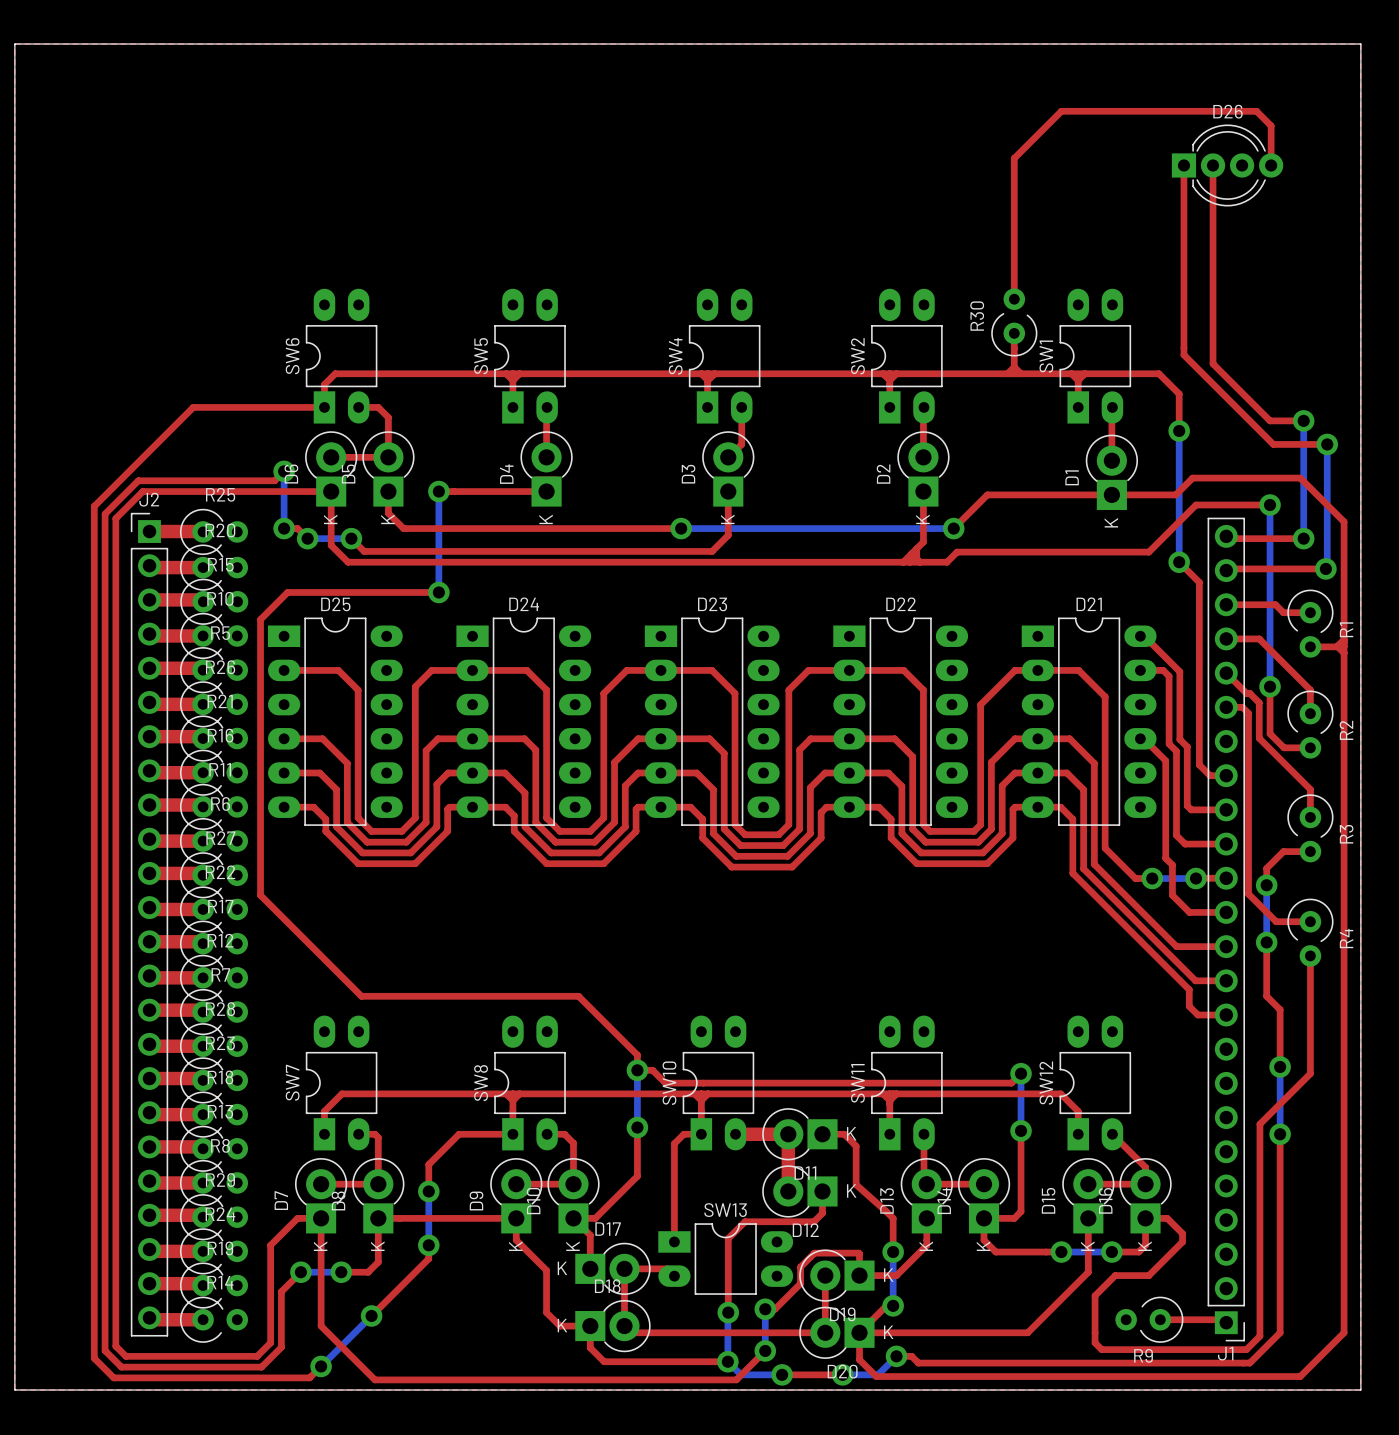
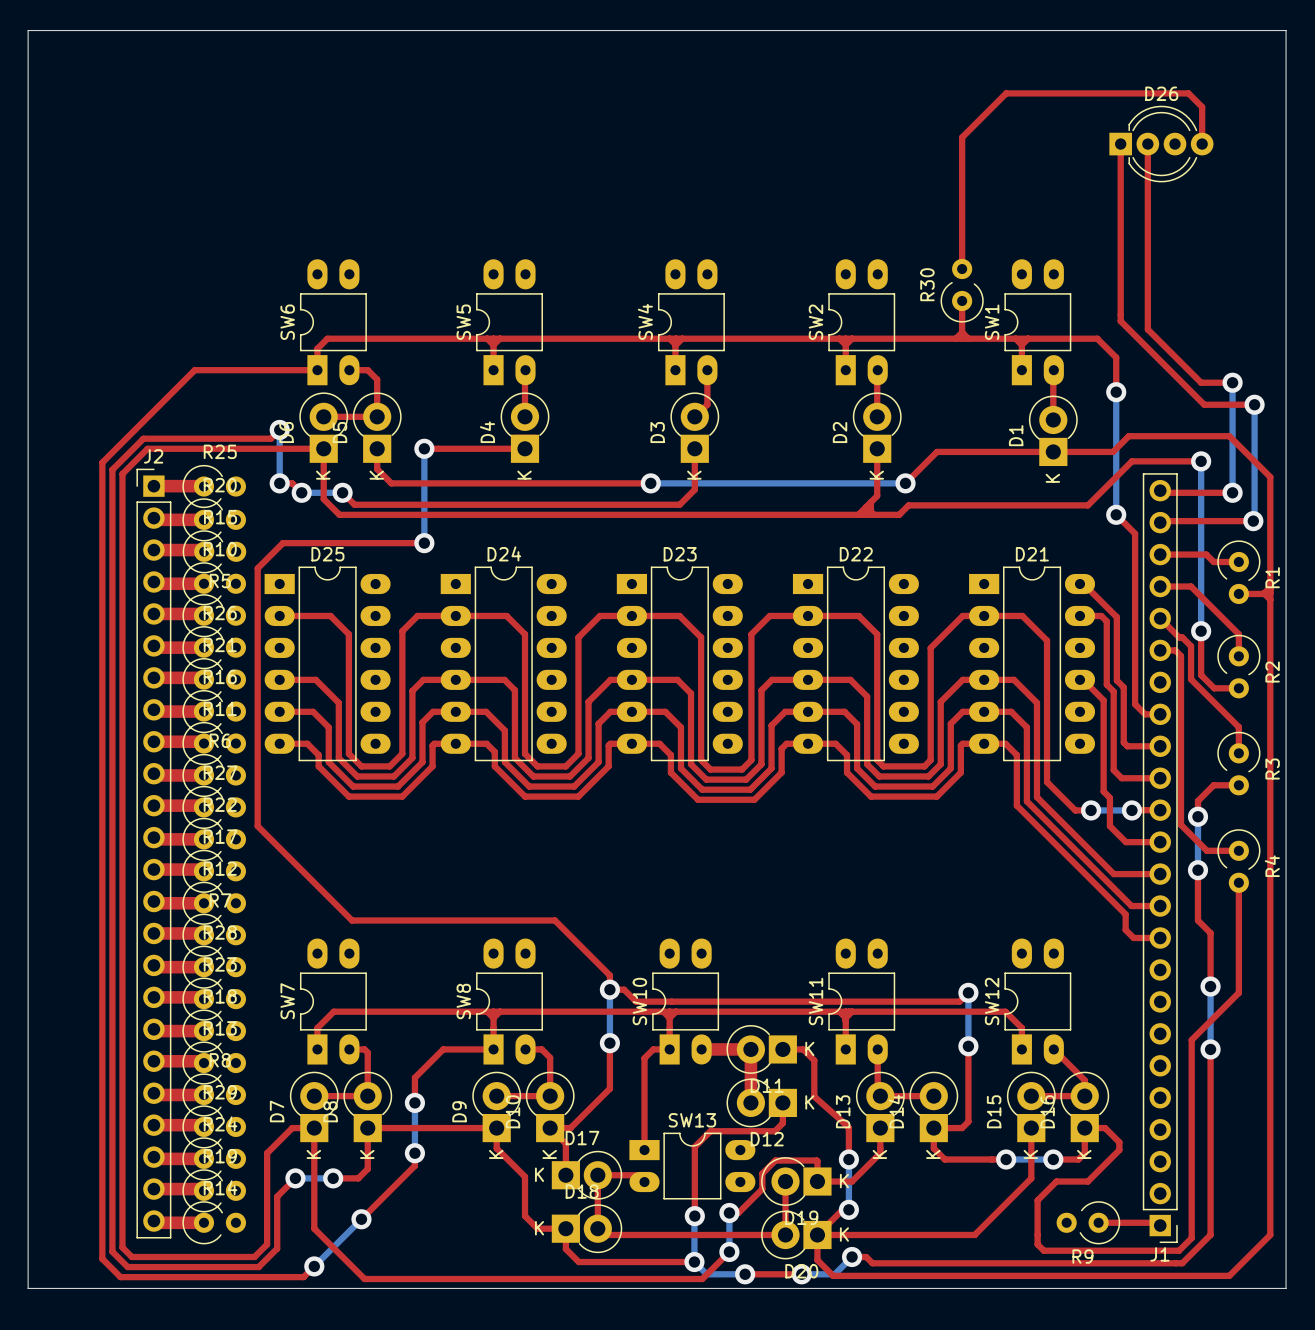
top zone outline: (14, 44) (14, 1390) (1360, 1390) (1360, 44) (14, 44) -> none

